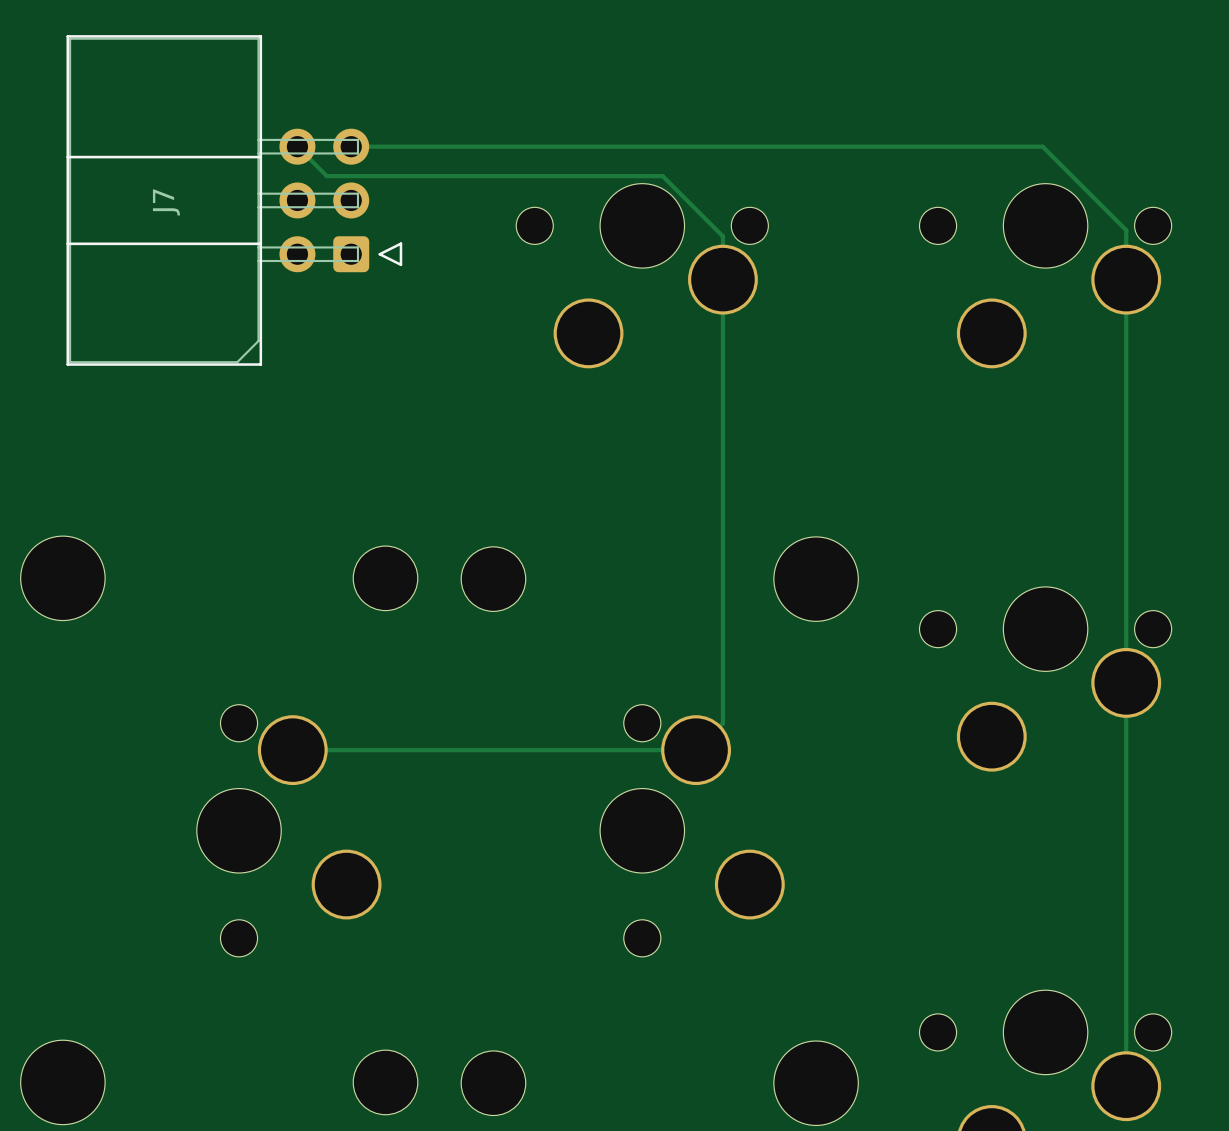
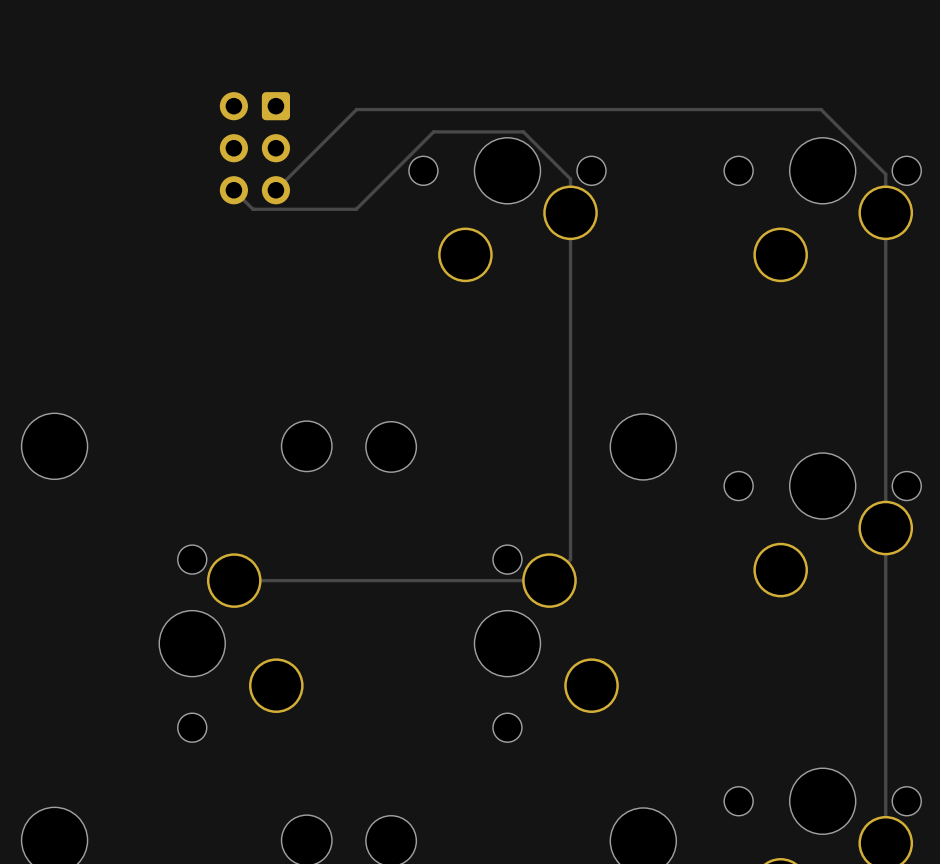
track: (297, 146) (326, 176) (547, 176) -> (233, 190) (252, 209) (356, 209) (433, 131)
track: (351, 146) (1043, 147) -> (275, 190) (356, 109) (821, 109)
J7 side: top (234, 200) -> bottom (254, 148)

